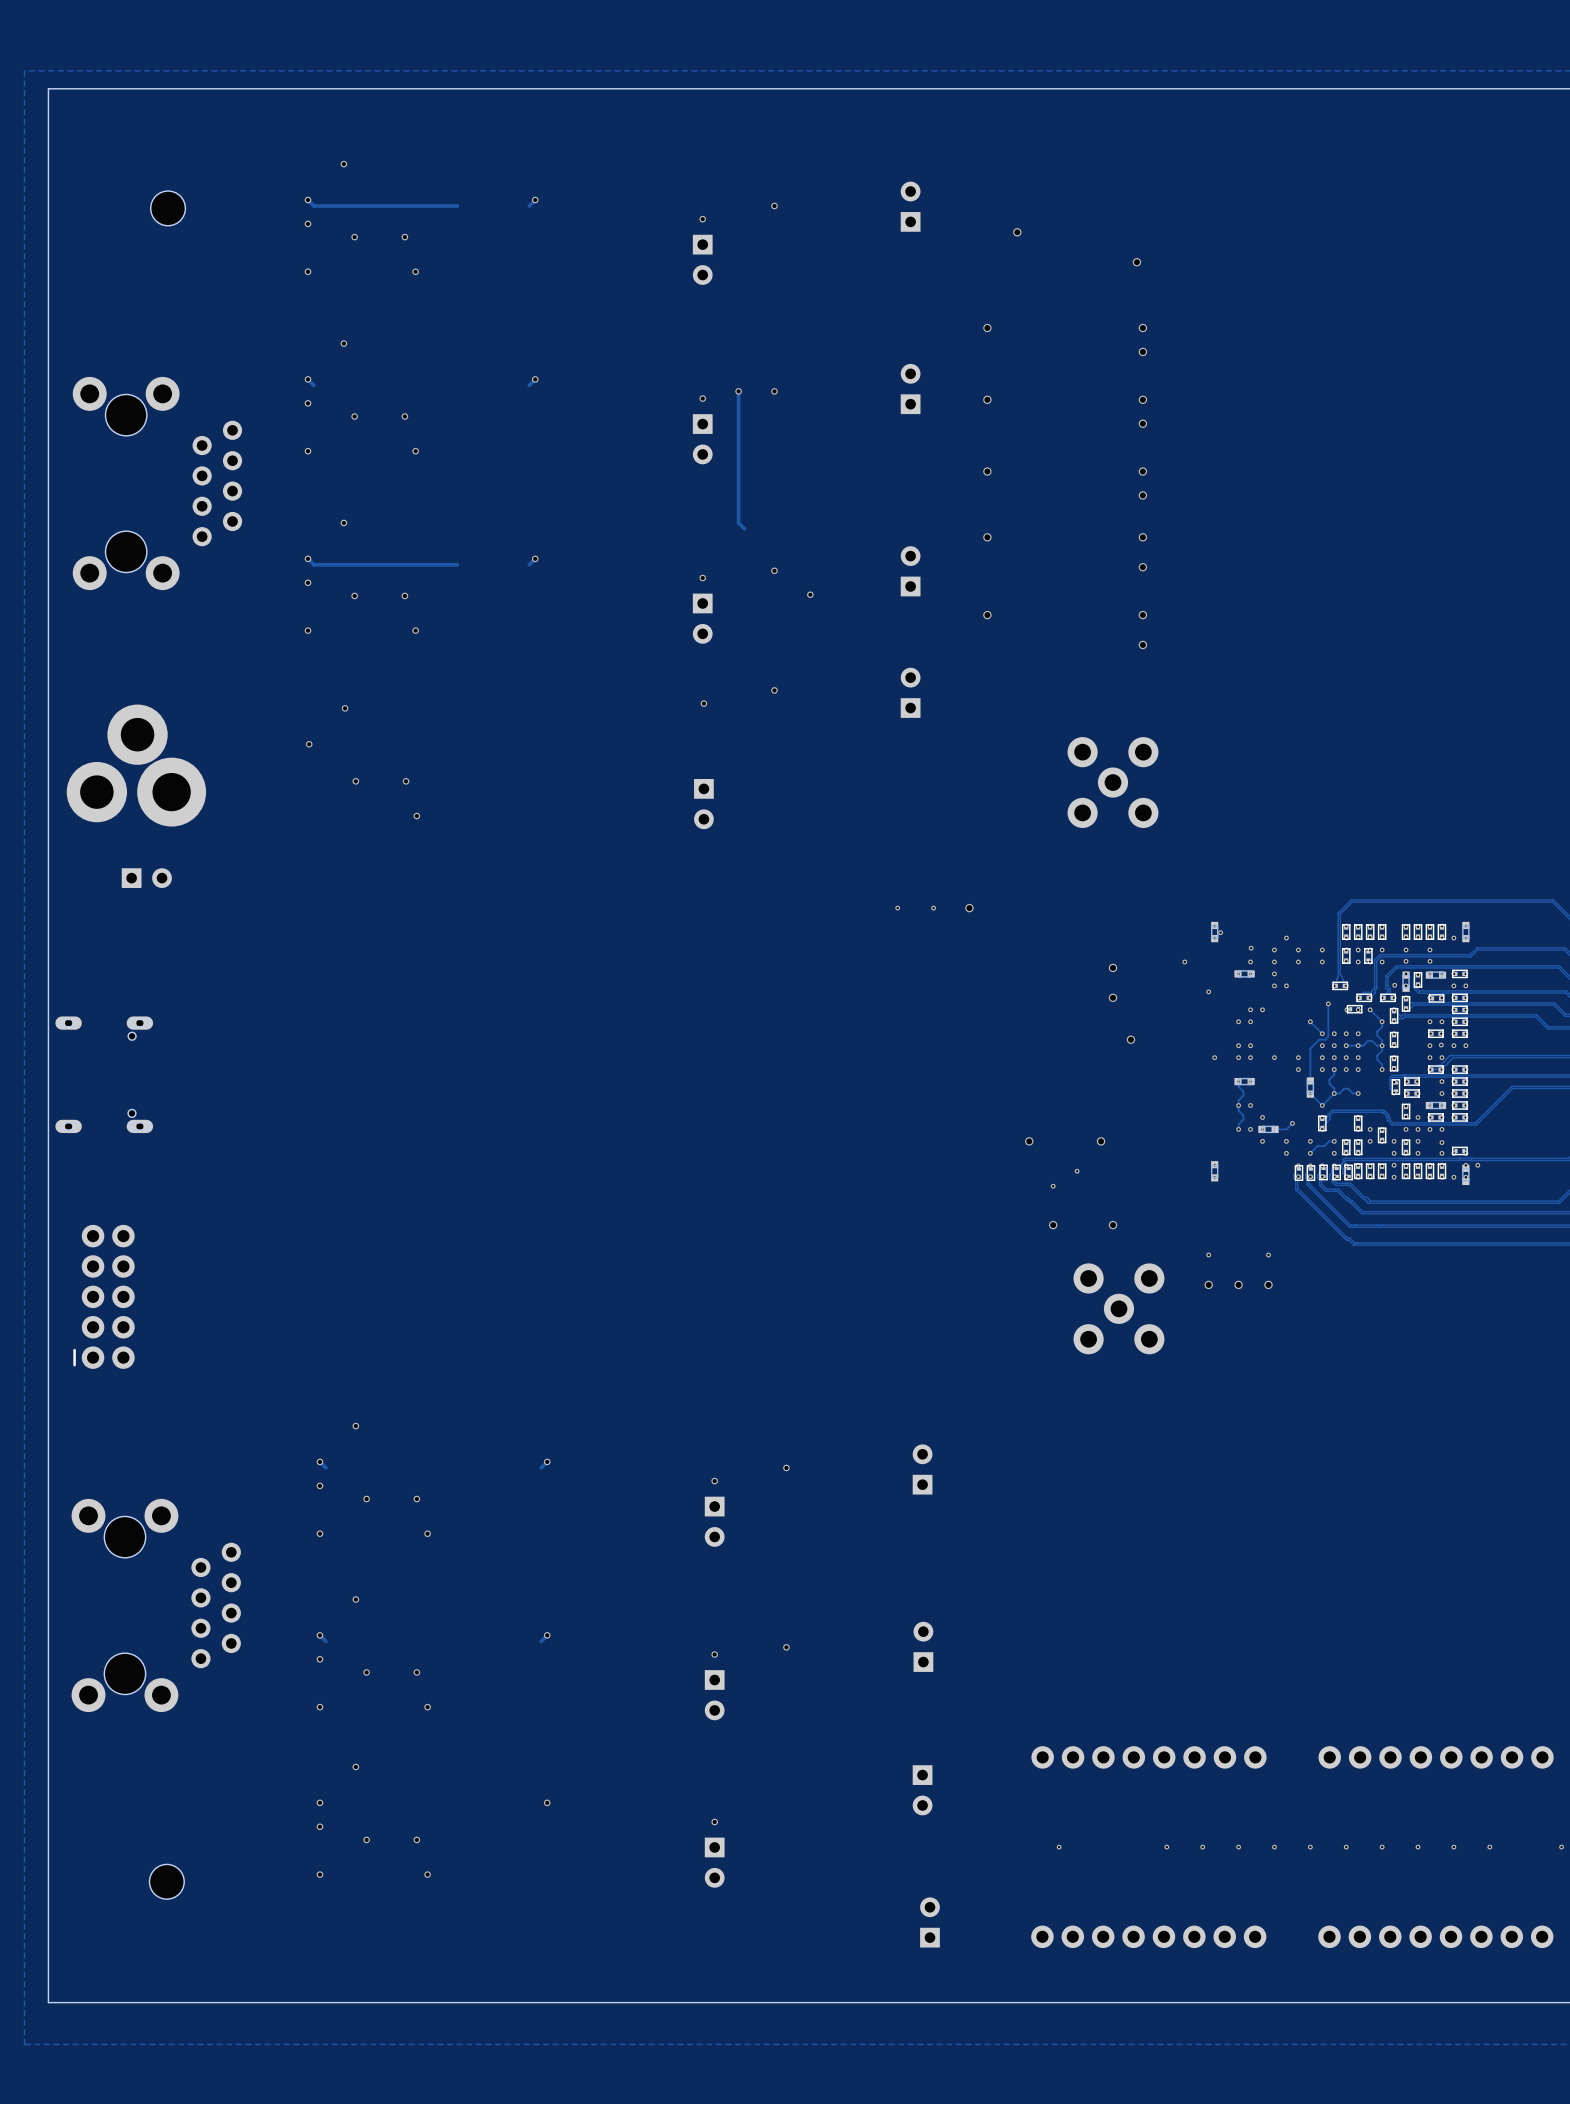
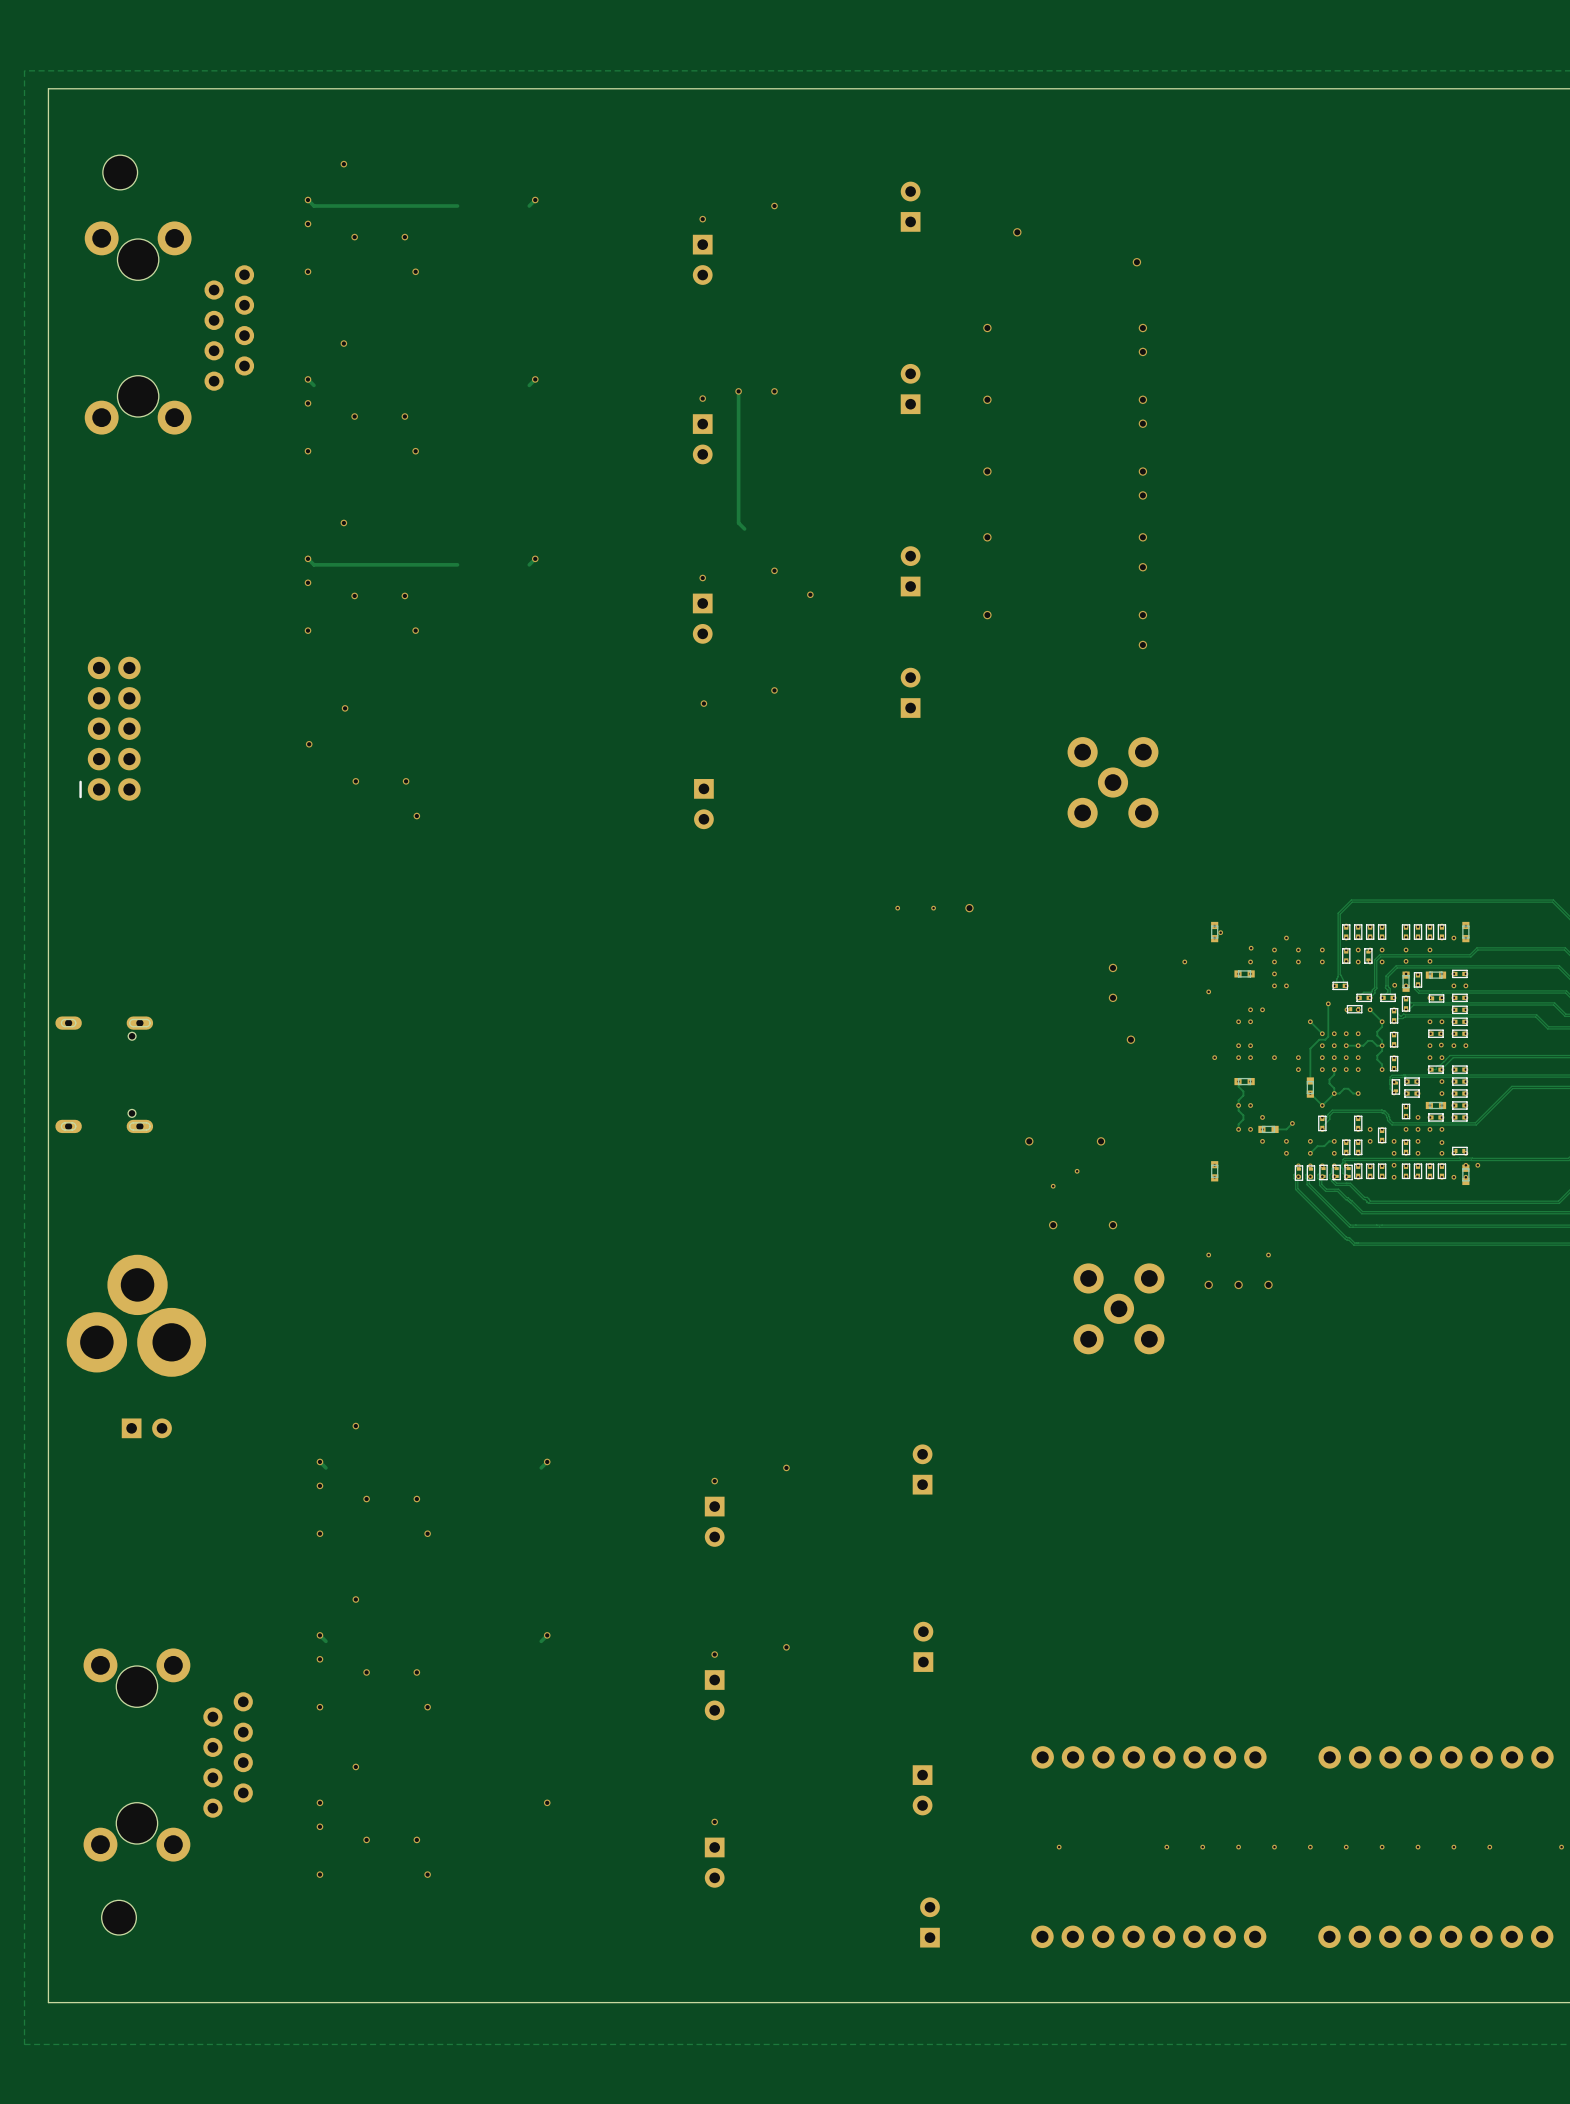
hole position: (168, 208) -> (120, 172)
part position: (157, 483) -> (169, 328)
part: none -> (110, 728)
part: (136, 765) -> none
part: (146, 878) -> none
part: (104, 1296) -> none
part: none -> (136, 1315)
part: none -> (146, 1428)
part position: (156, 1605) -> (168, 1755)
hole position: (166, 1881) -> (119, 1917)

